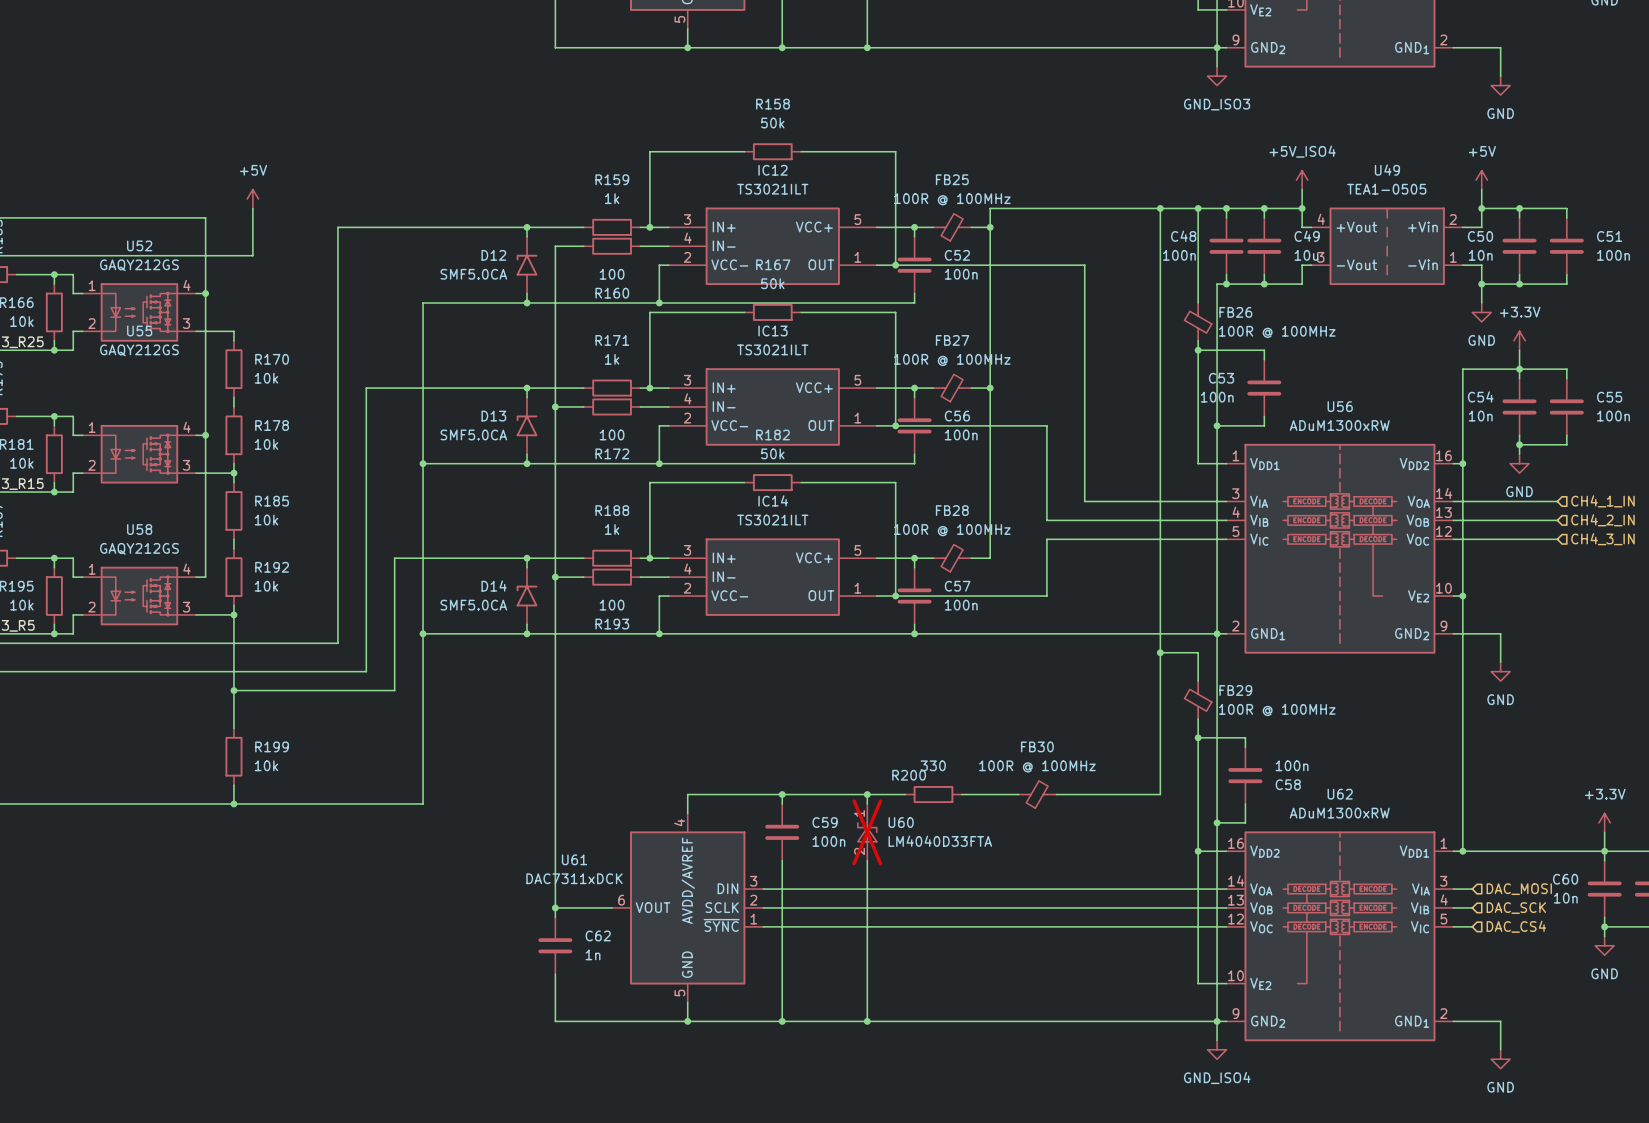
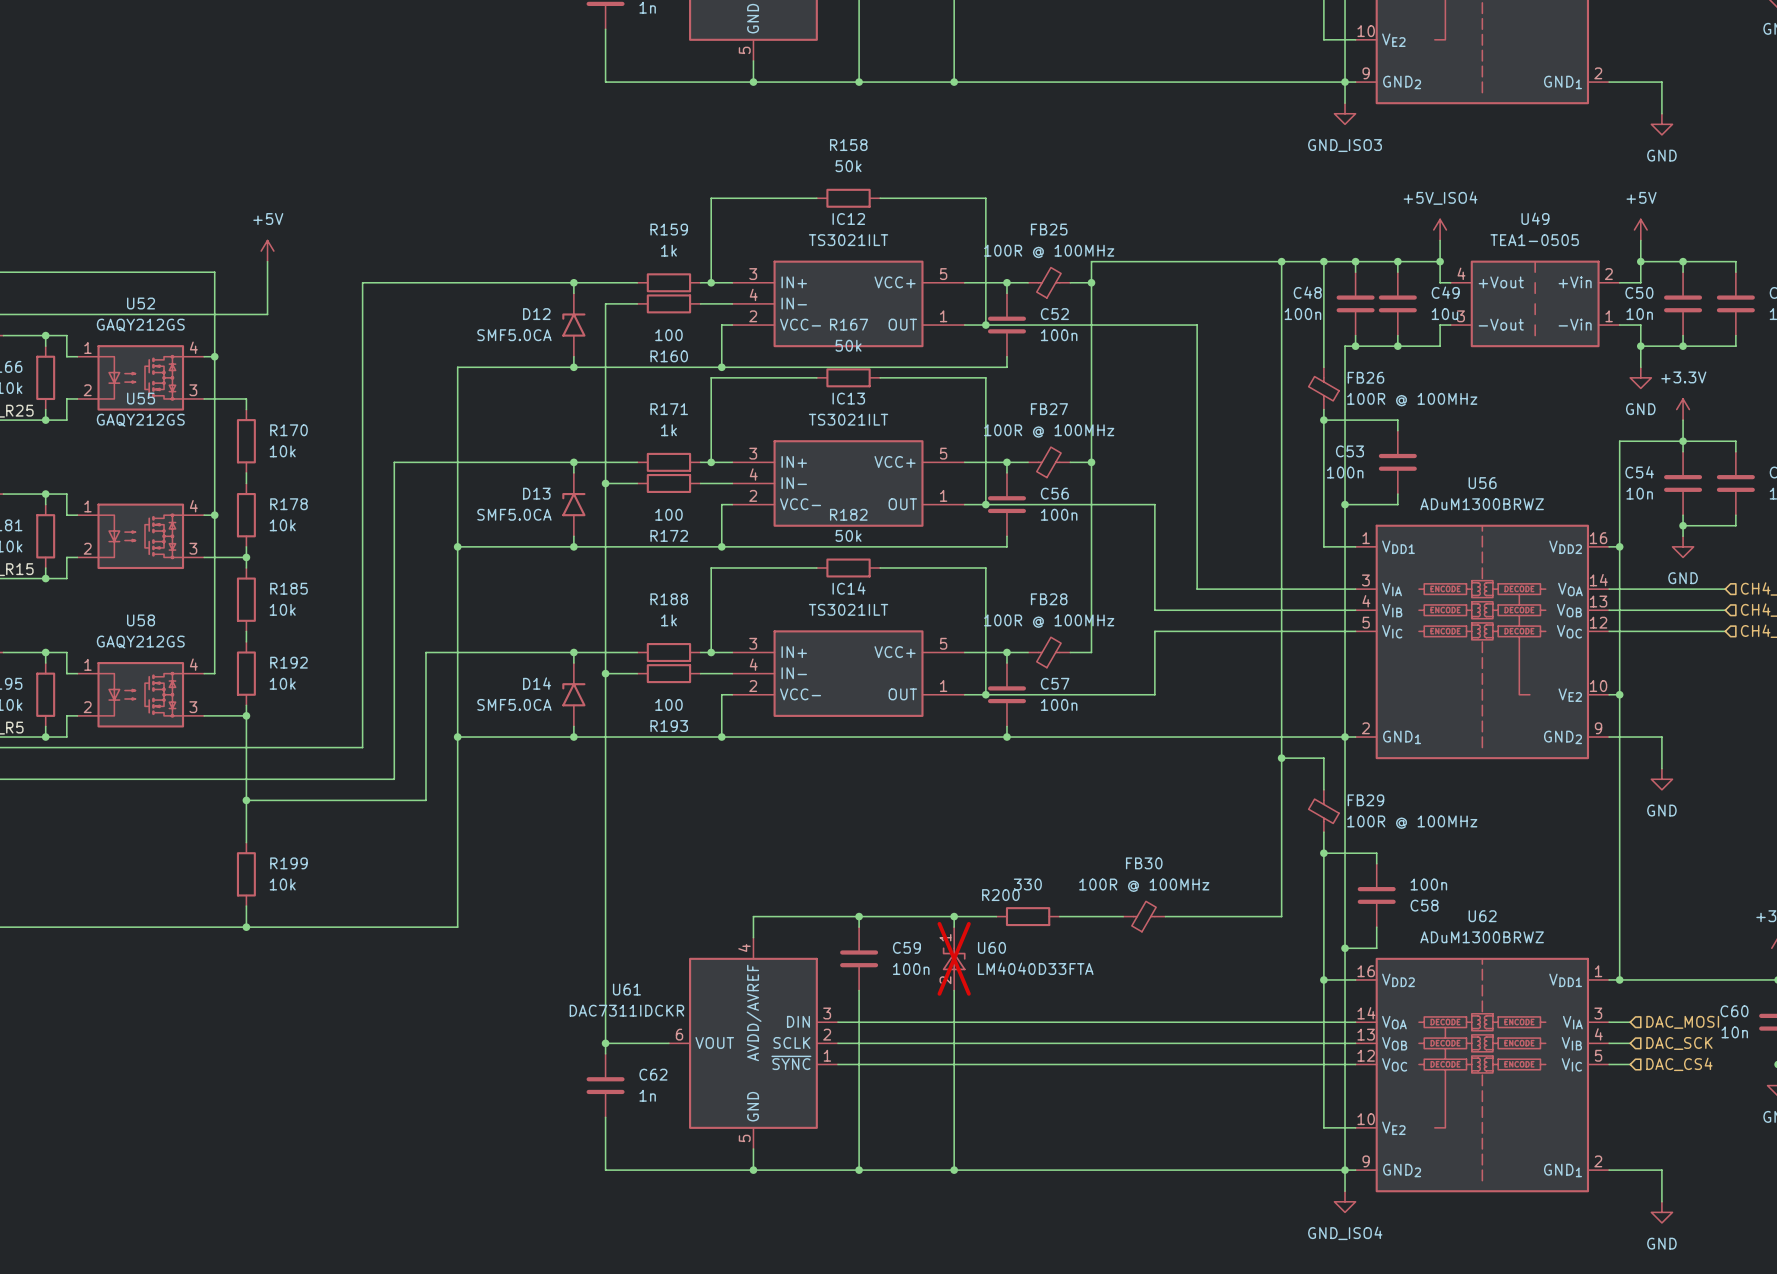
U56 value: ADuM1300xRW (1339, 425) -> ADuM1300BRWZ (1482, 504)
U62 value: ADuM1300xRW (1339, 813) -> ADuM1300BRWZ (1482, 937)
U61 value: DAC7311xDCK (574, 878) -> DAC7311IDCKR (626, 1010)

